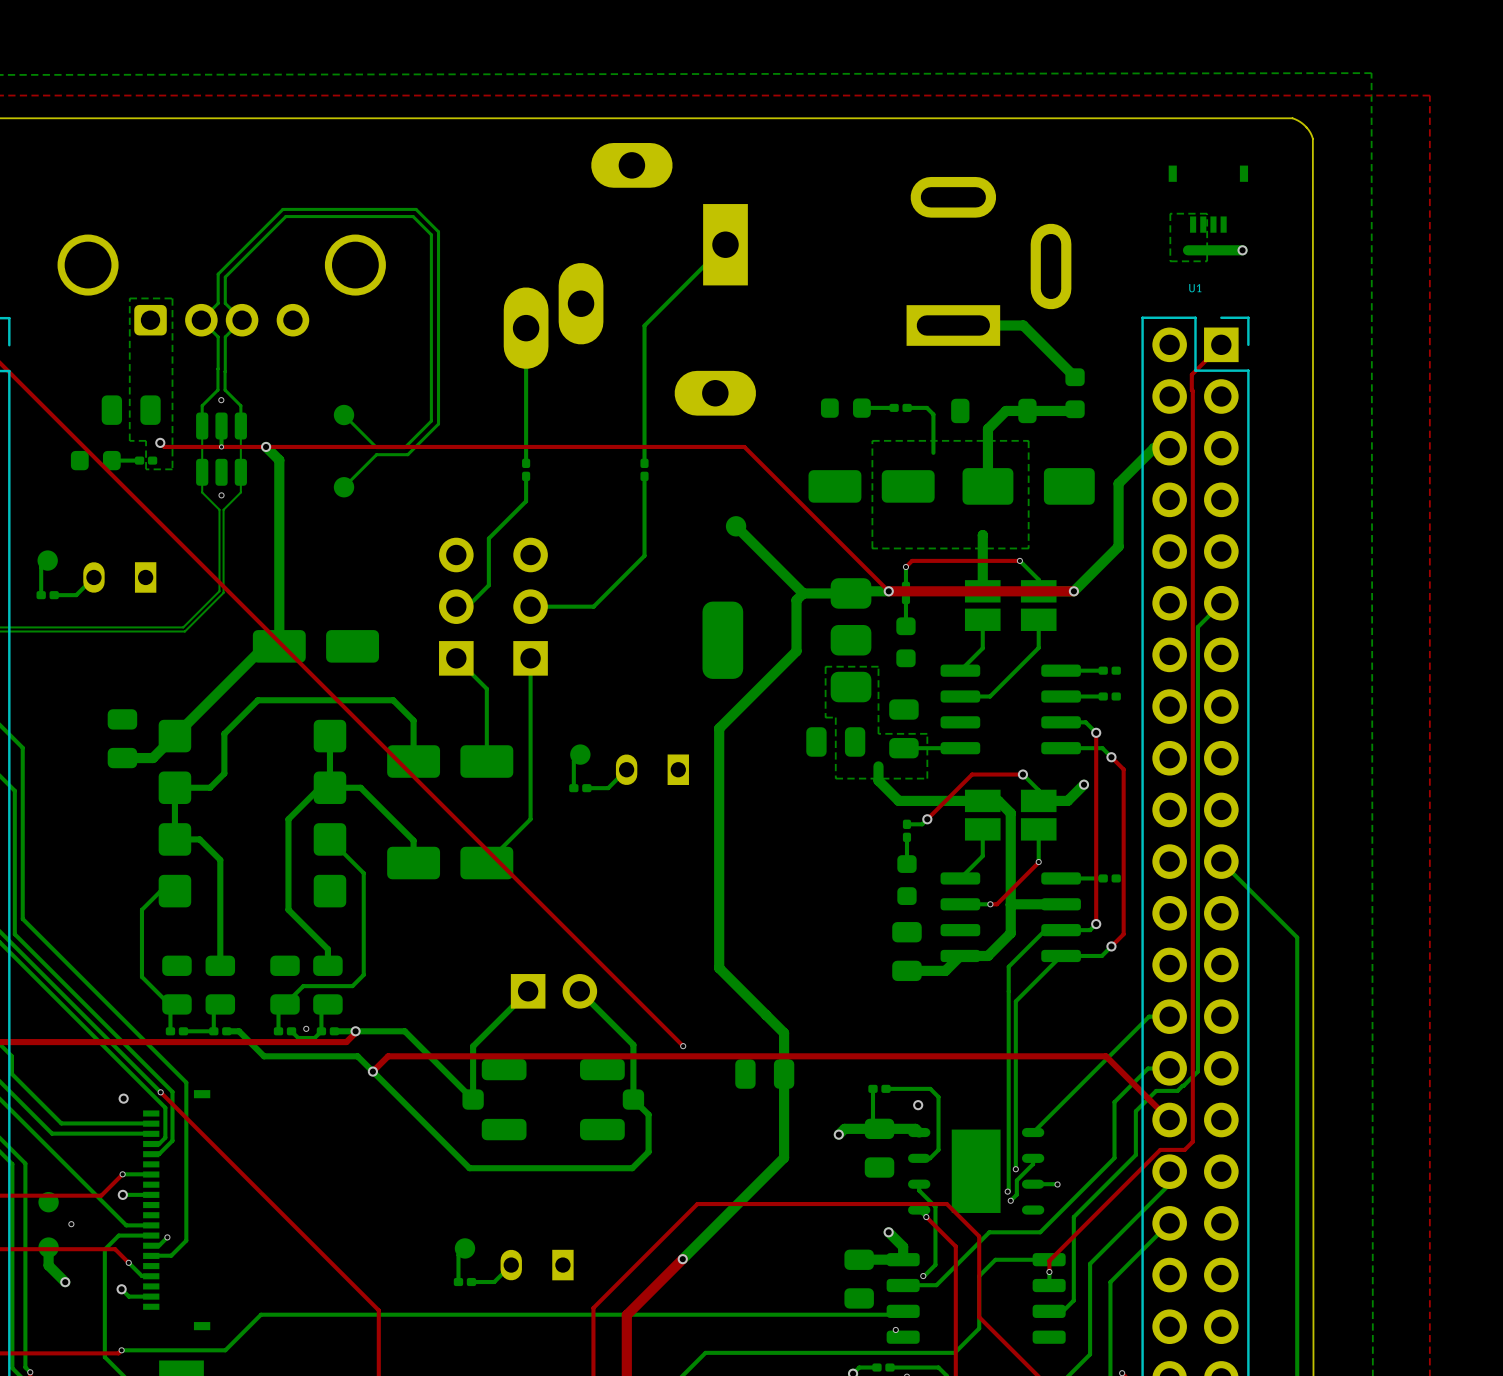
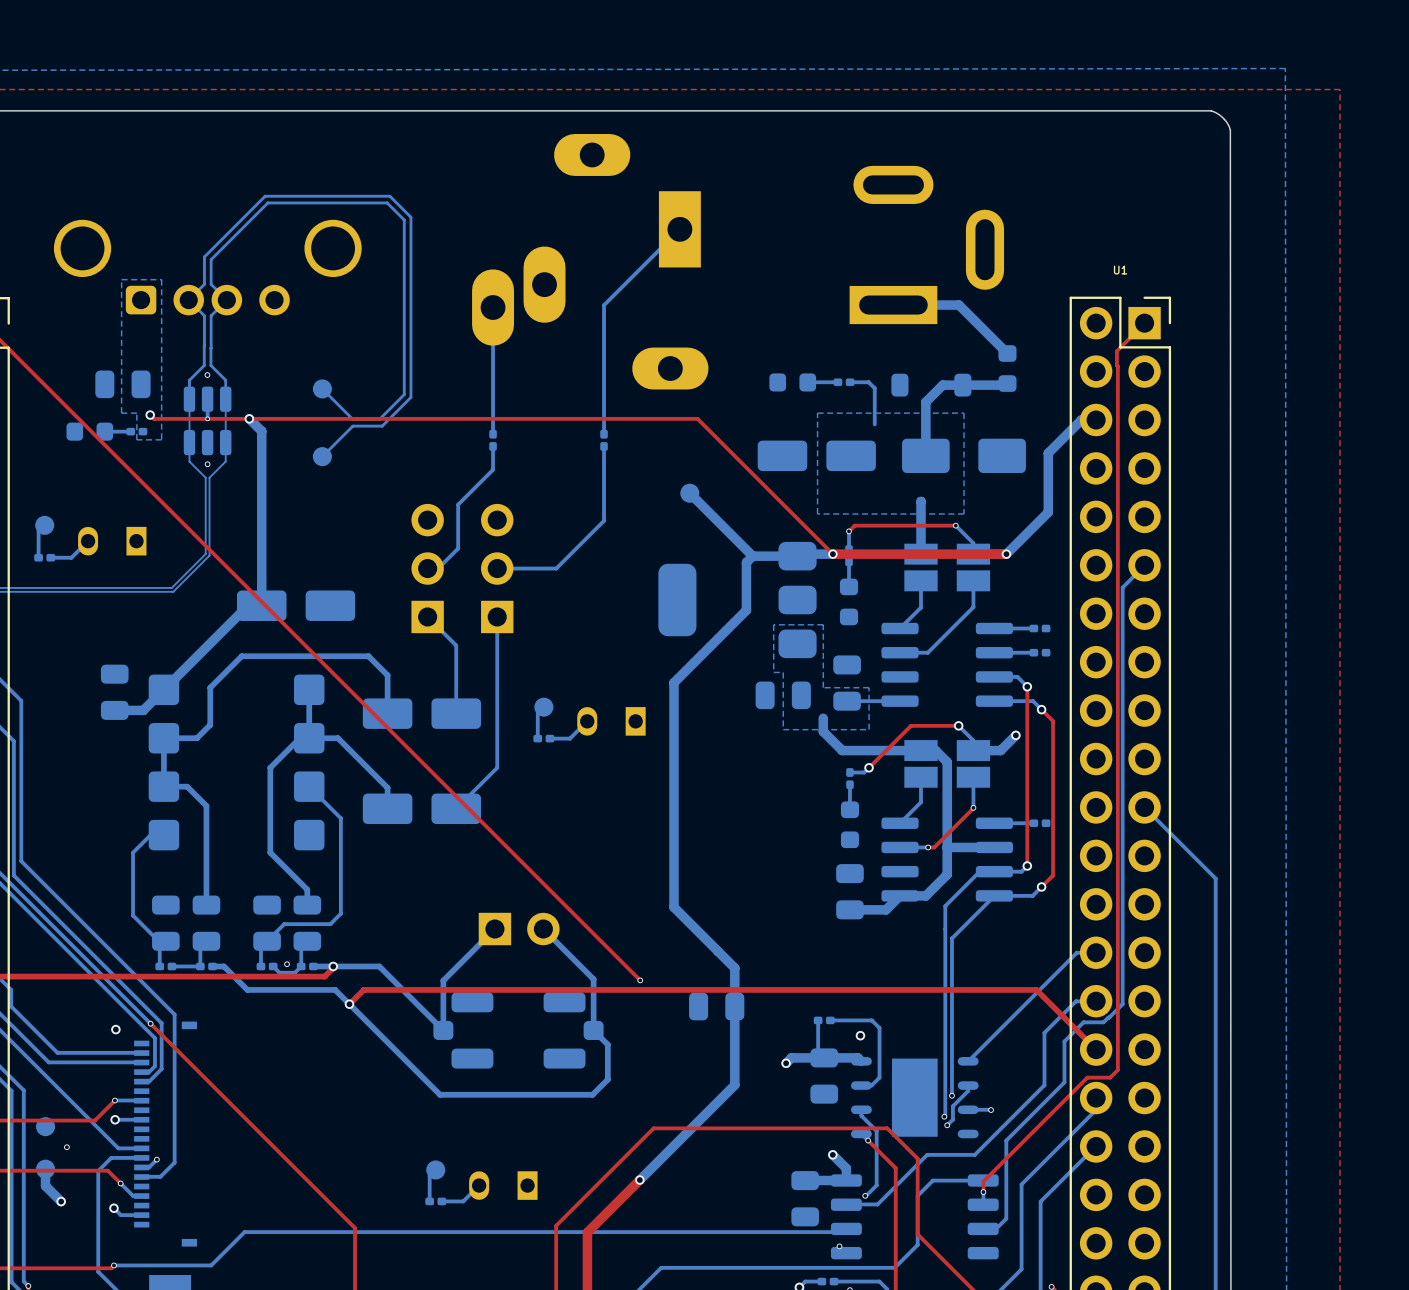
part: (1208, 199) -> none
bottom zone outline: (1170, 213) (1207, 213) (1207, 261) (1170, 261) (1170, 213) -> none
bottom track: (1188, 250) (1242, 250) -> none
via: (1242, 250) -> none

